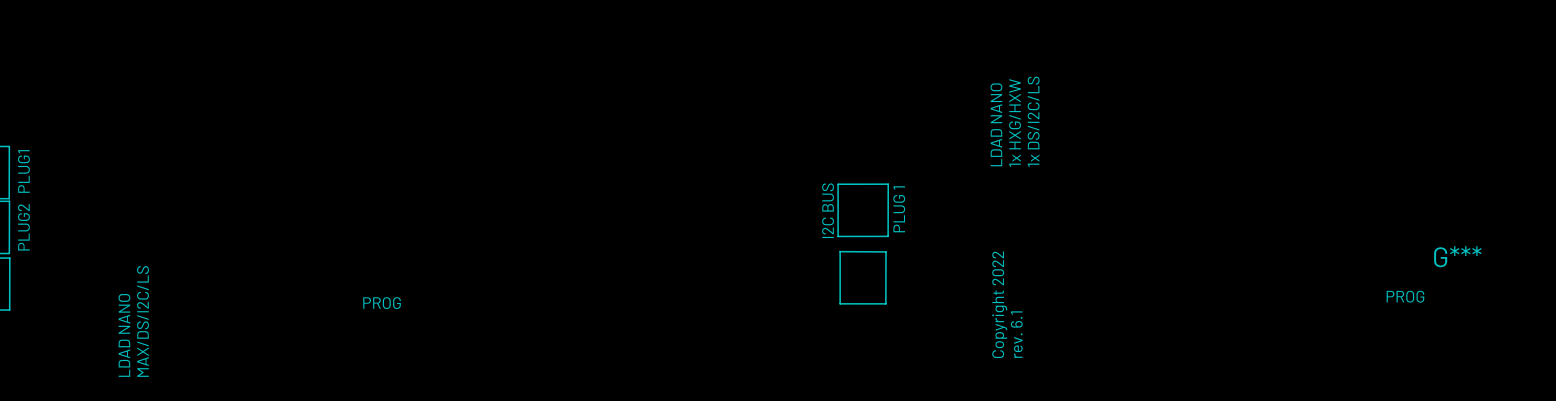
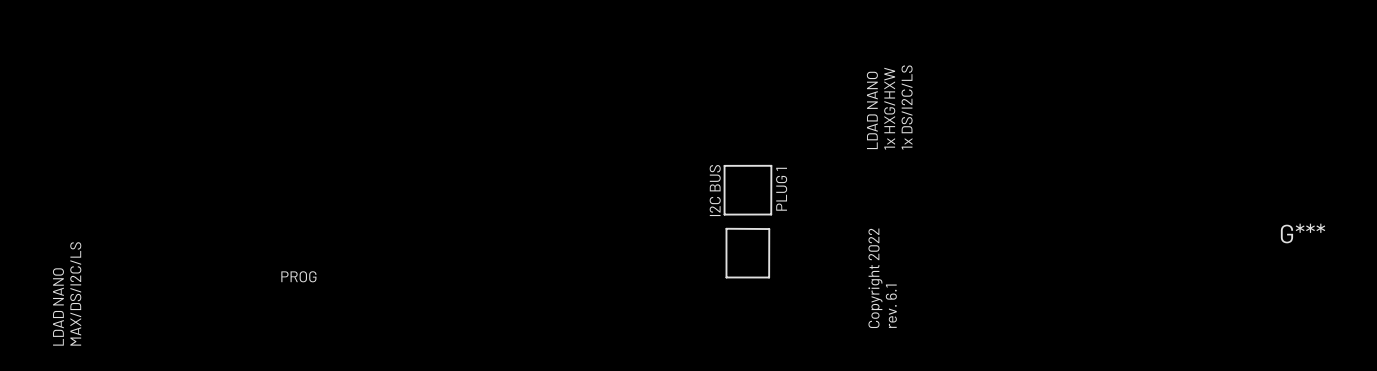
text: PROG (1405, 296) -> none

